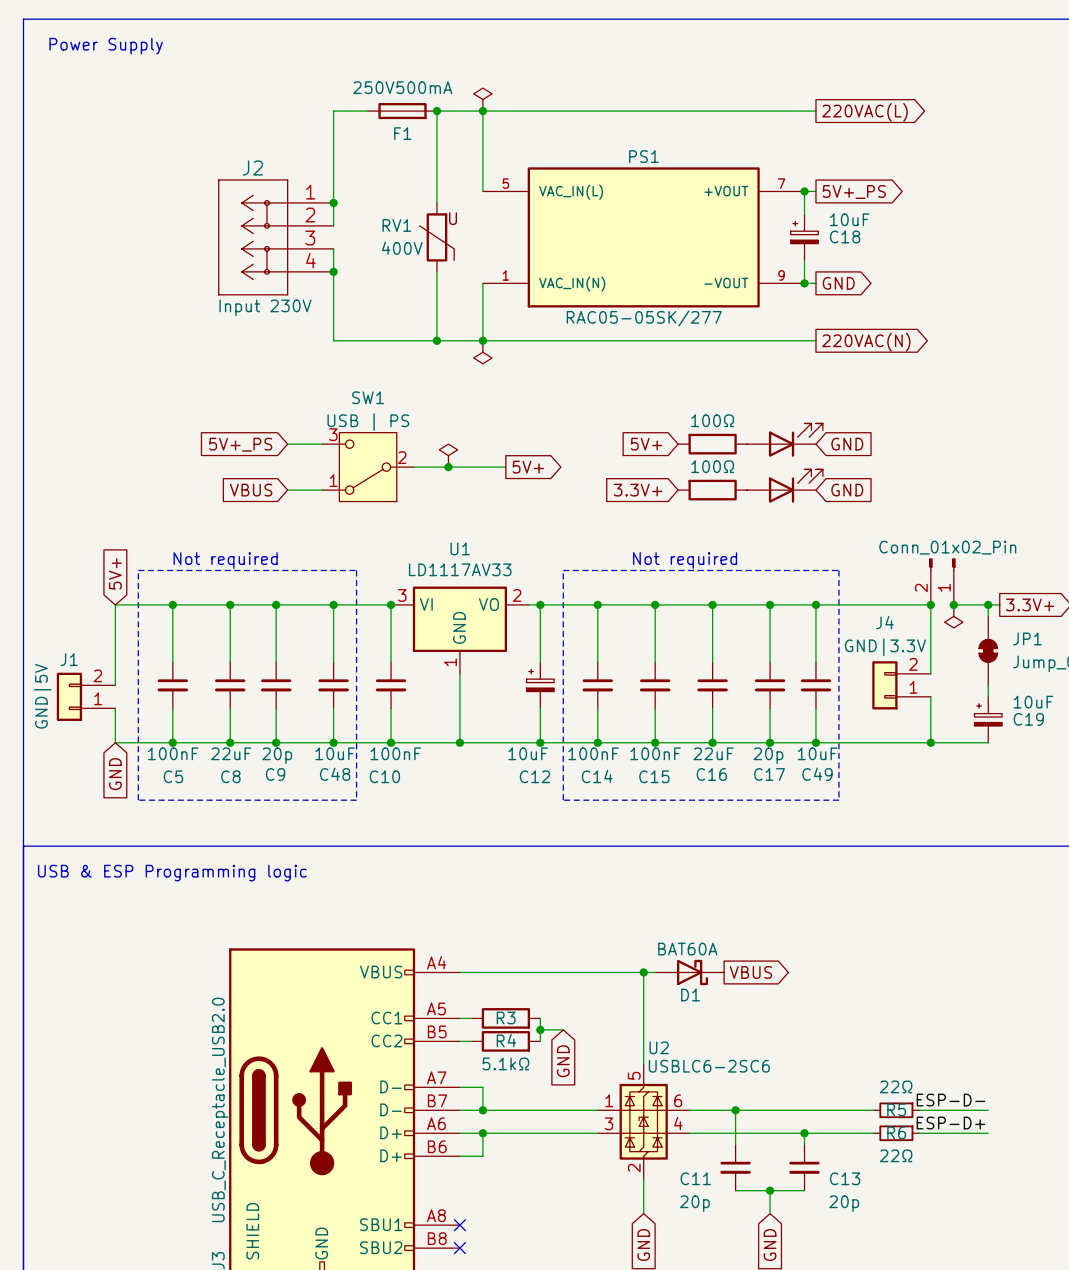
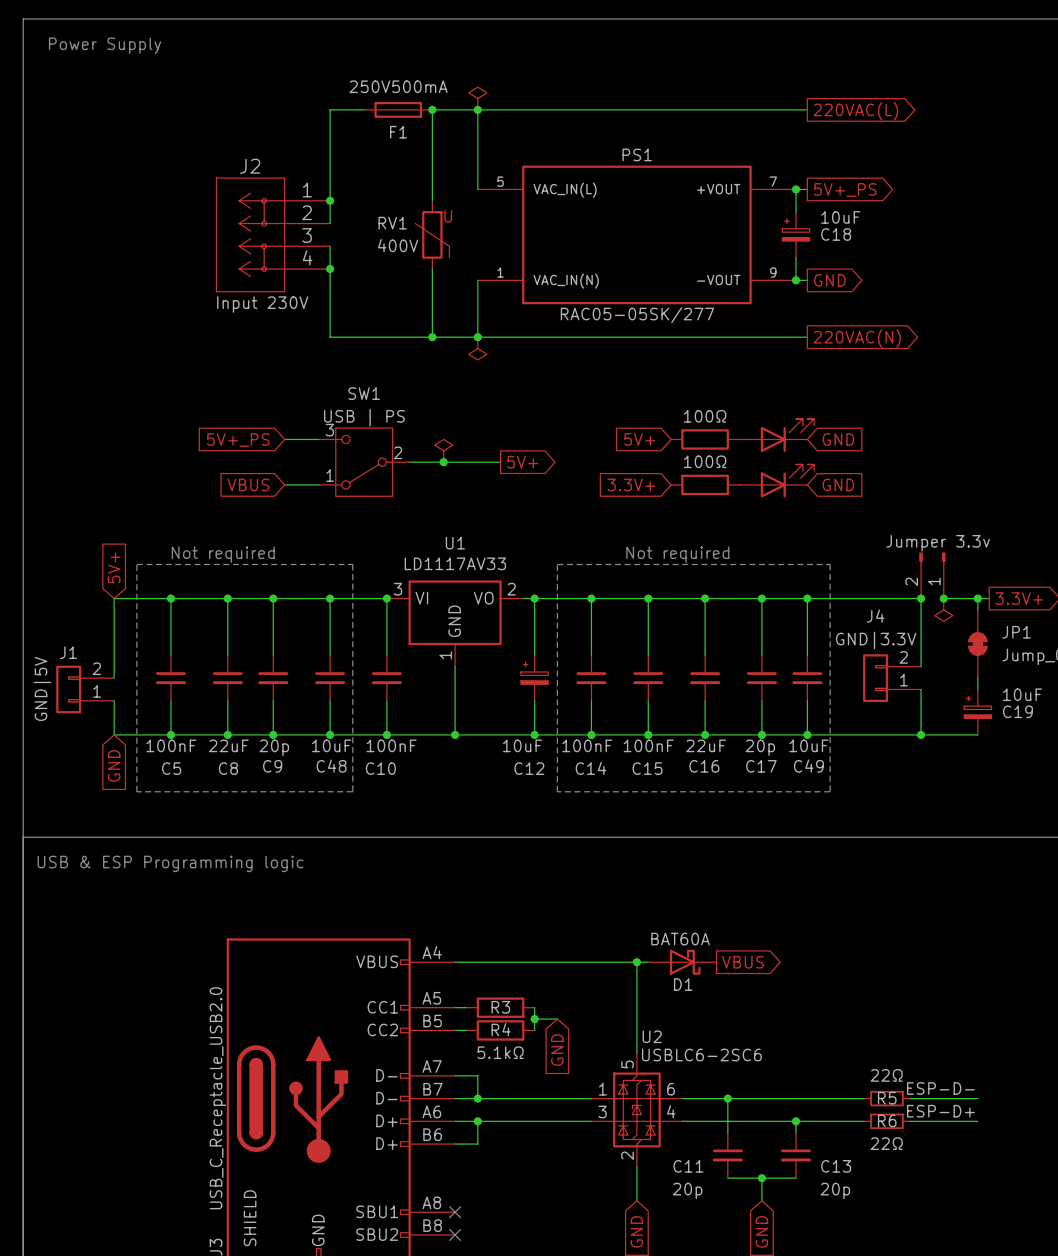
part value: Conn_01x02_Pin (947, 547) -> Jumper 3.3v (938, 543)

